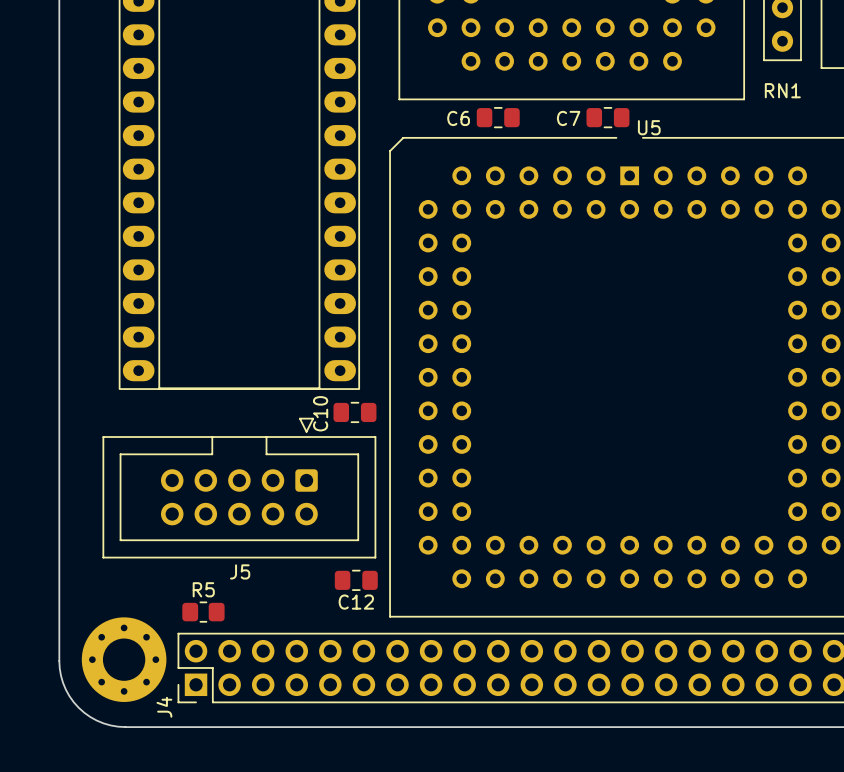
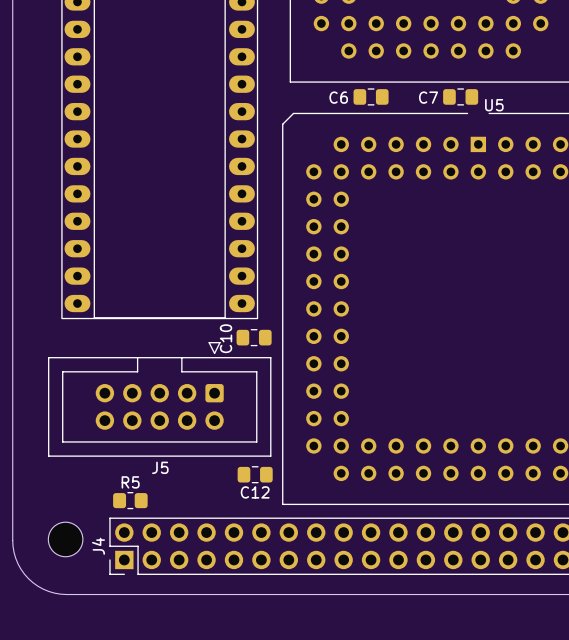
part footprint: [81, 617, 167, 702] -> [48, 522, 83, 557]
J4 name position: J4 (164, 707) -> J4 (98, 546)

